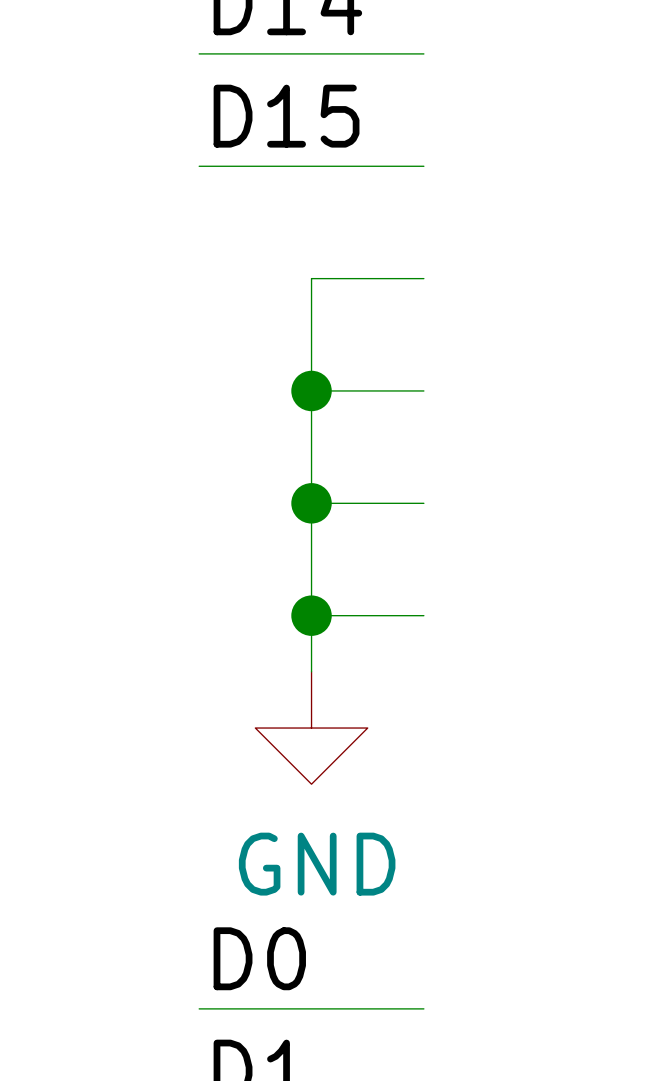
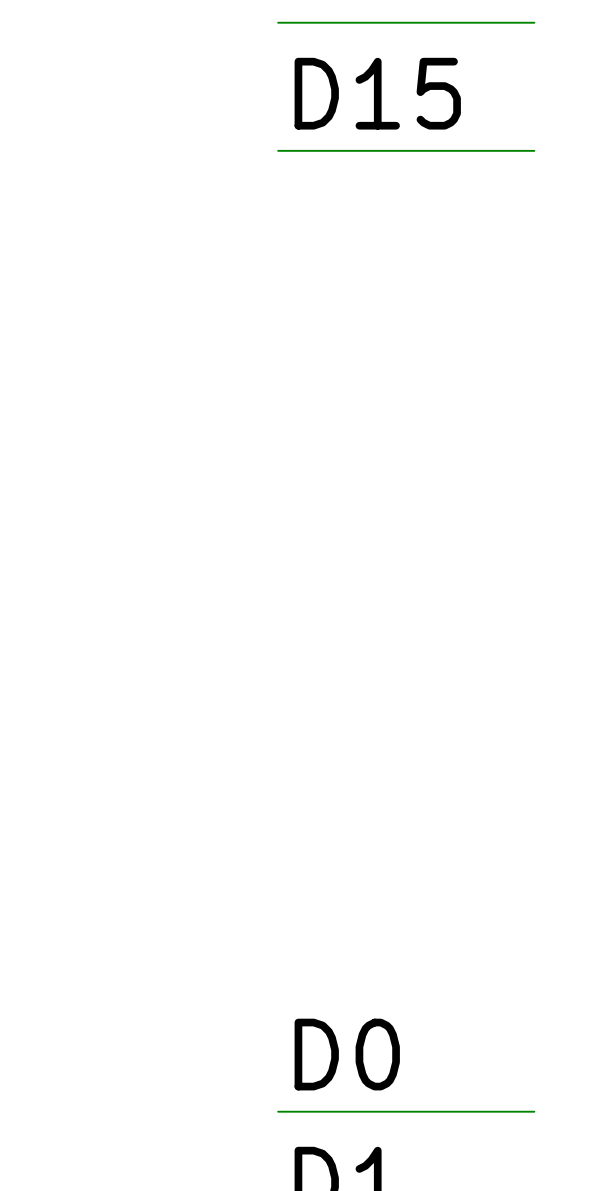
wire: (423, 278) (311, 278) (311, 671) -> none
wire: (311, 390) (423, 390) -> none
junction: (311, 390) -> none
wire: (311, 503) (423, 503) -> none
junction: (311, 503) -> none
wire: (311, 615) (423, 615) -> none
junction: (311, 615) -> none
power symbol: GND (311, 728) -> none

